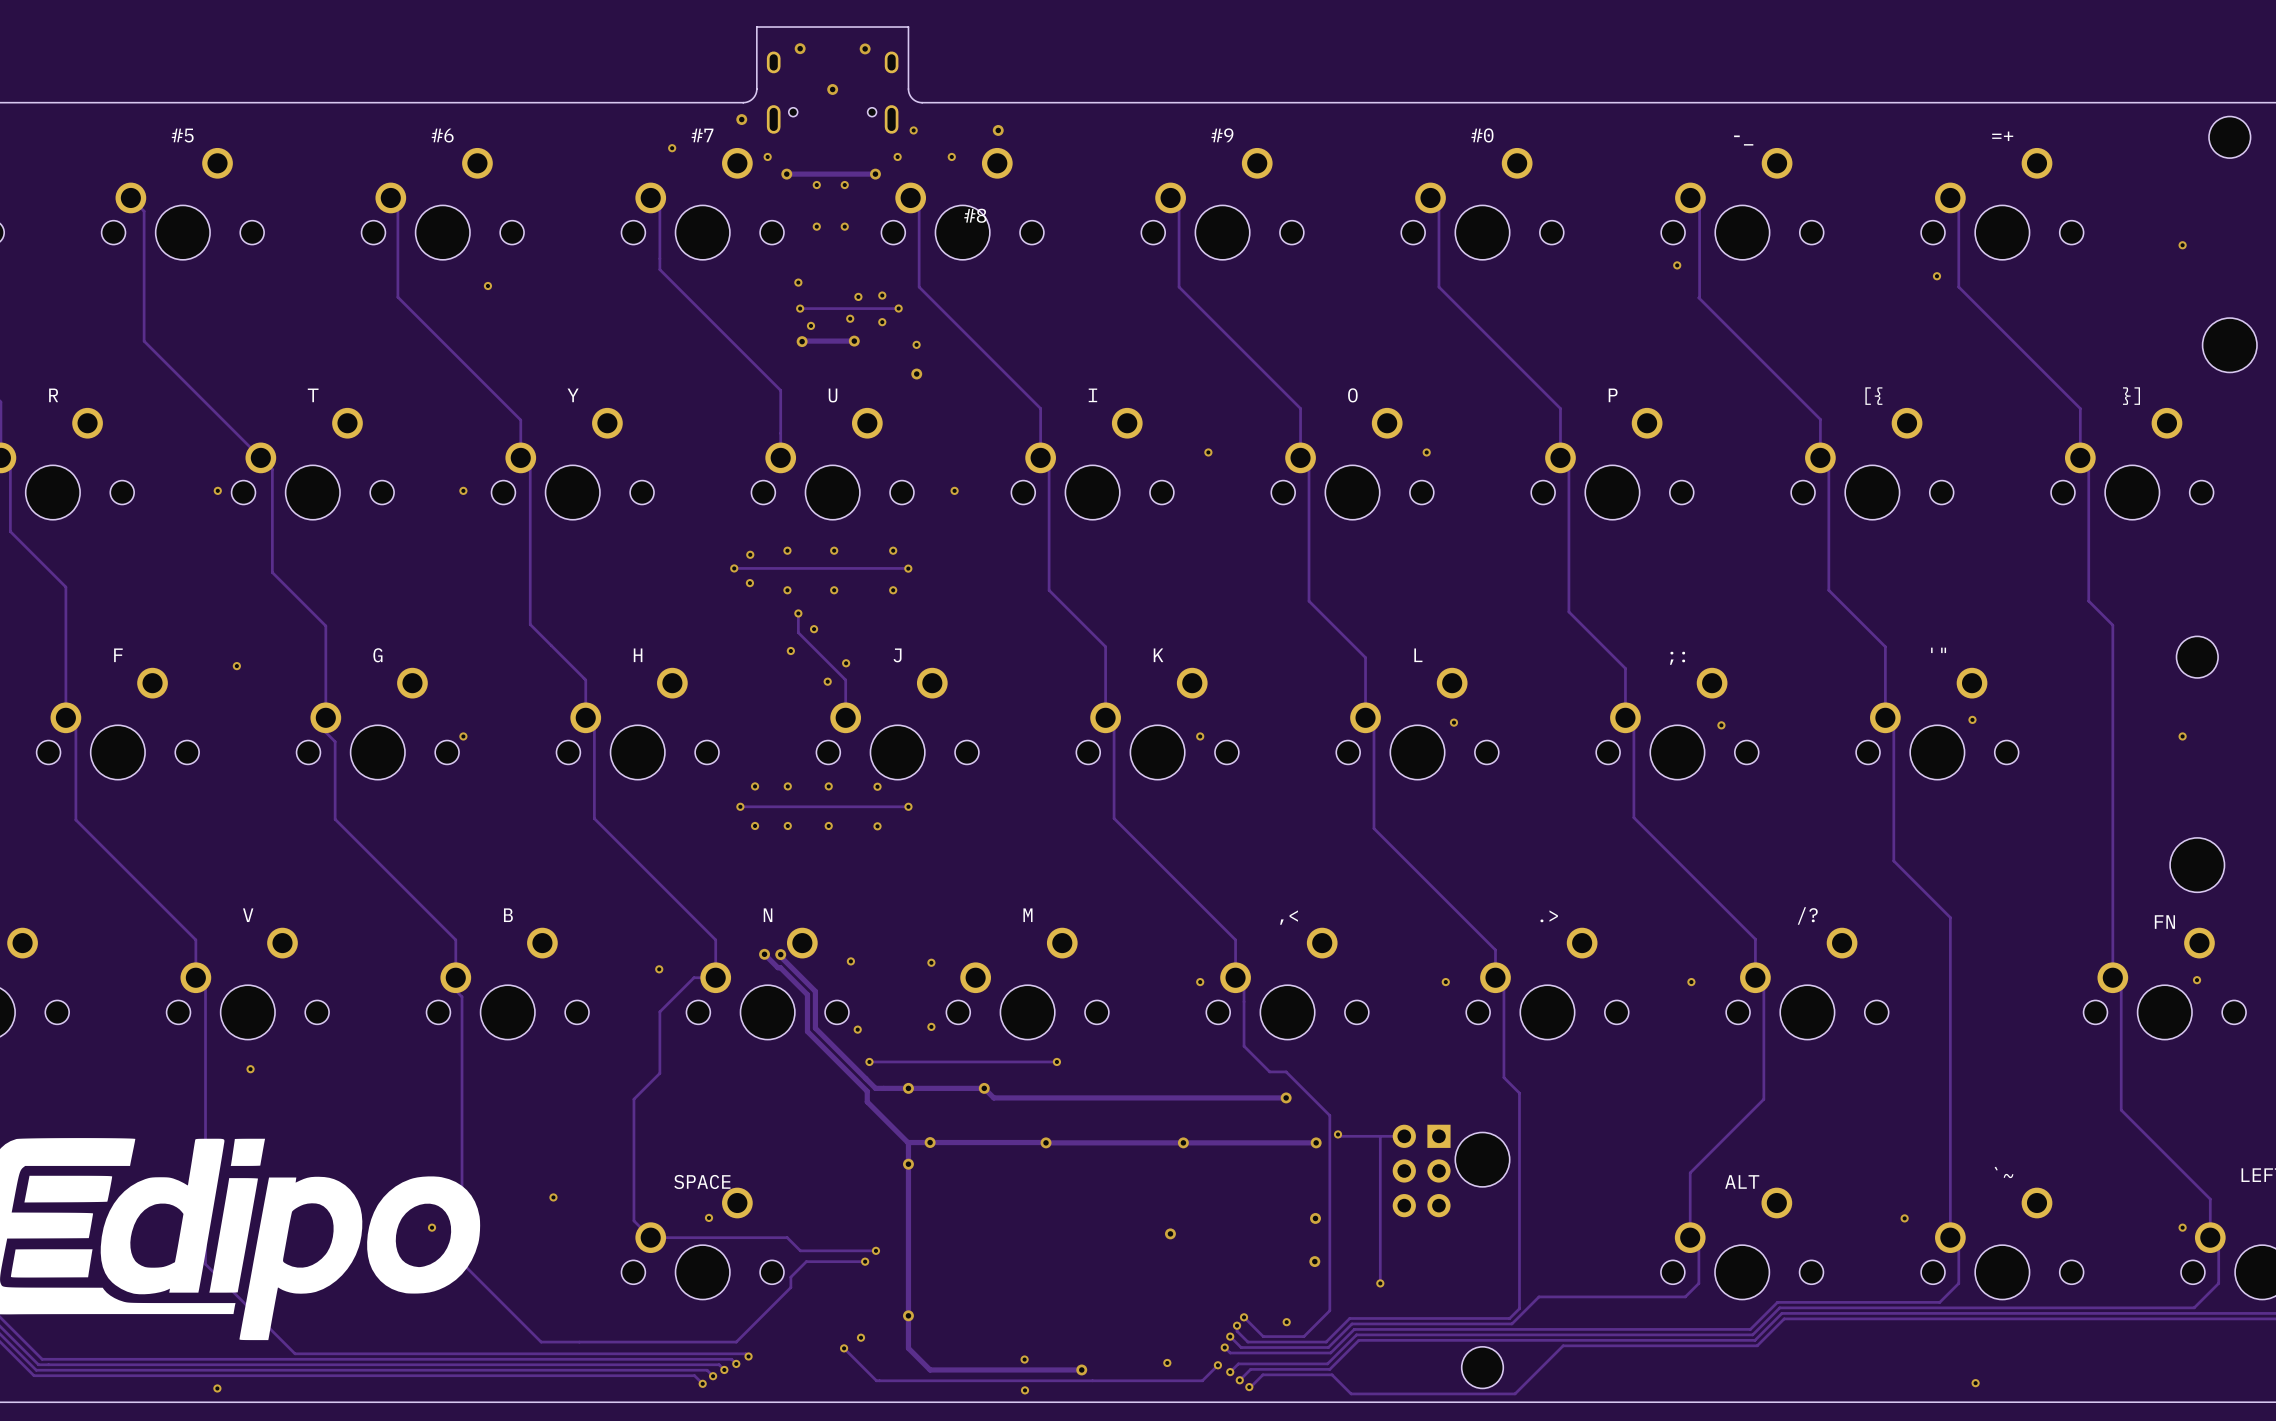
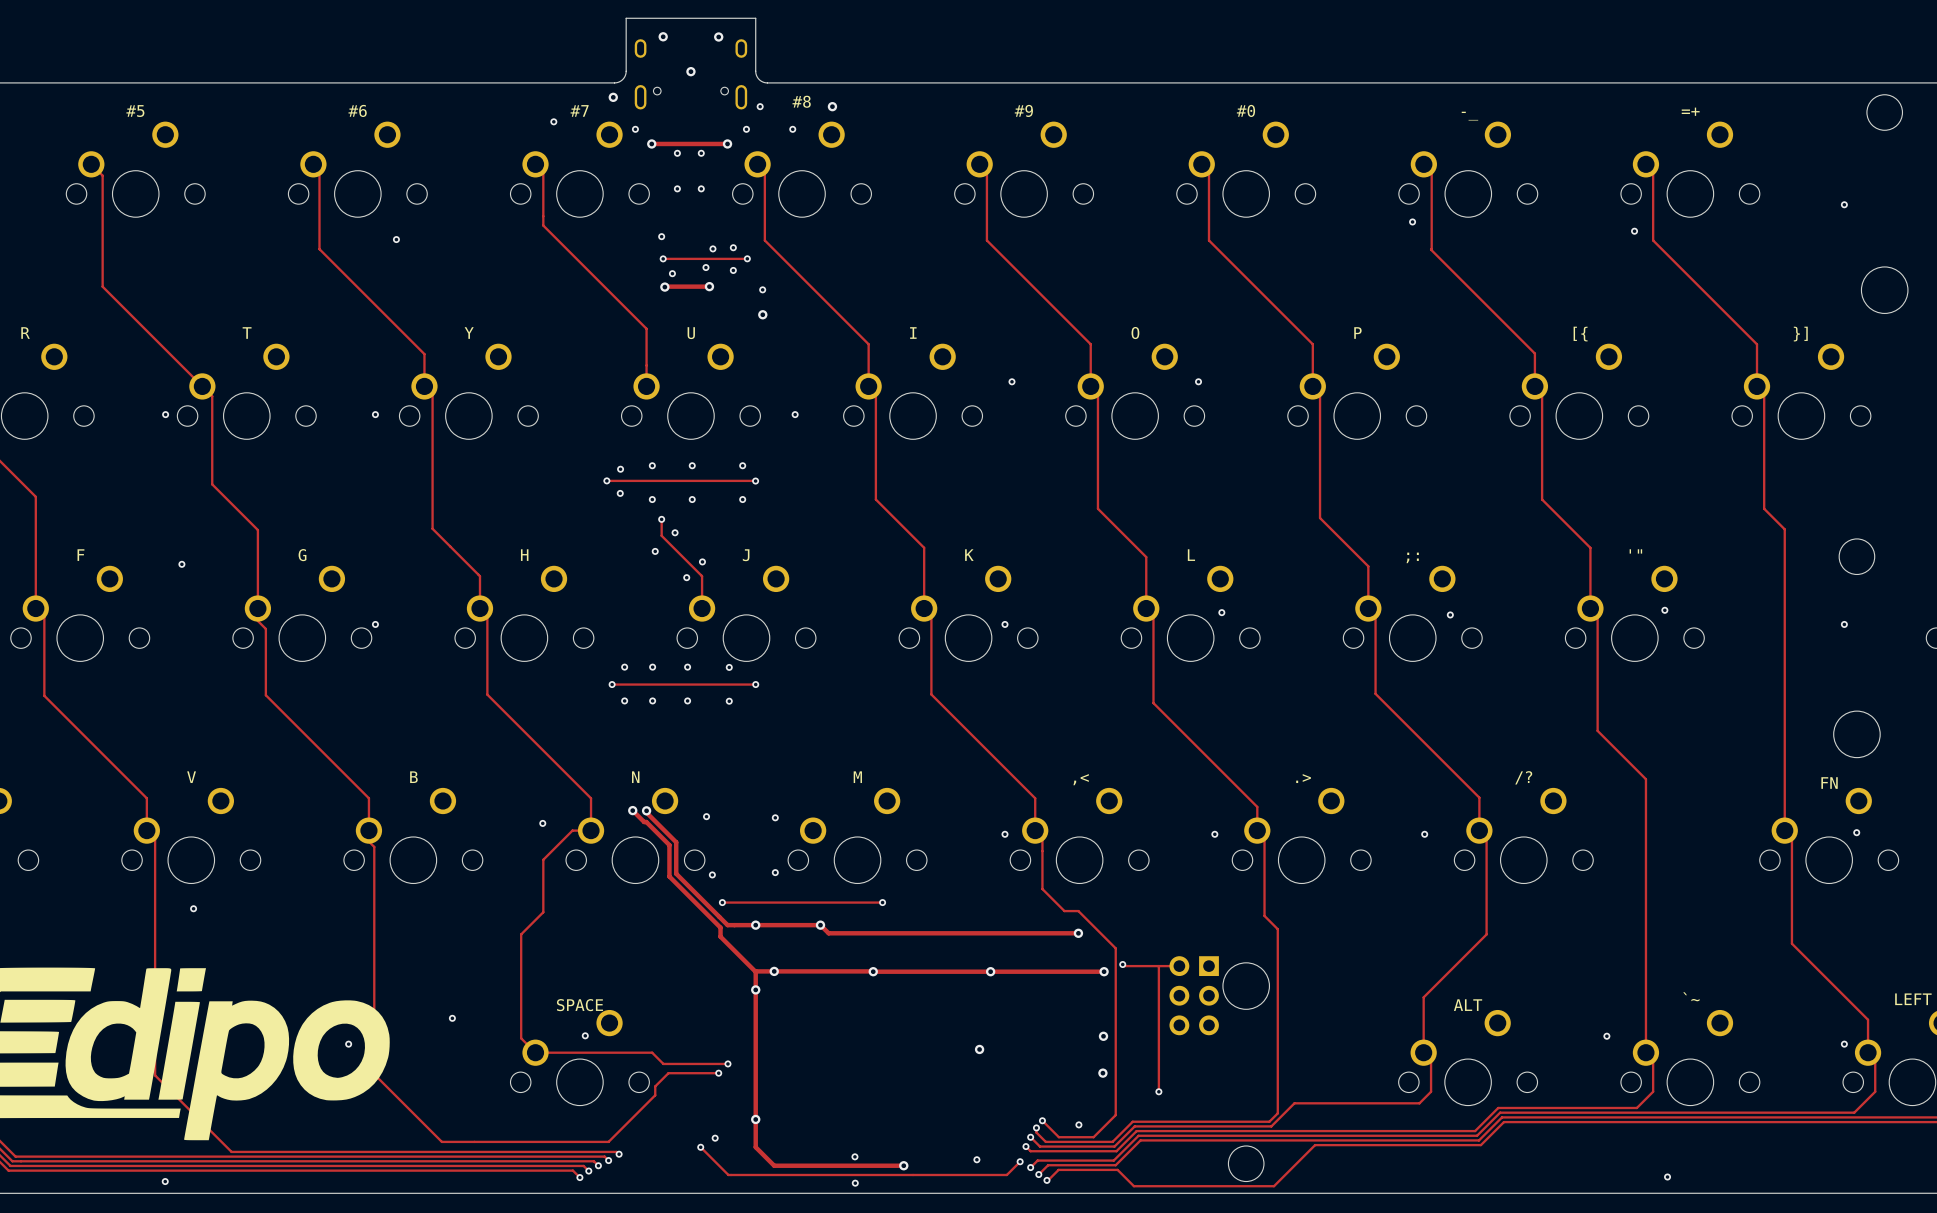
part value position: #8 (975, 215) -> #8 (801, 101)

